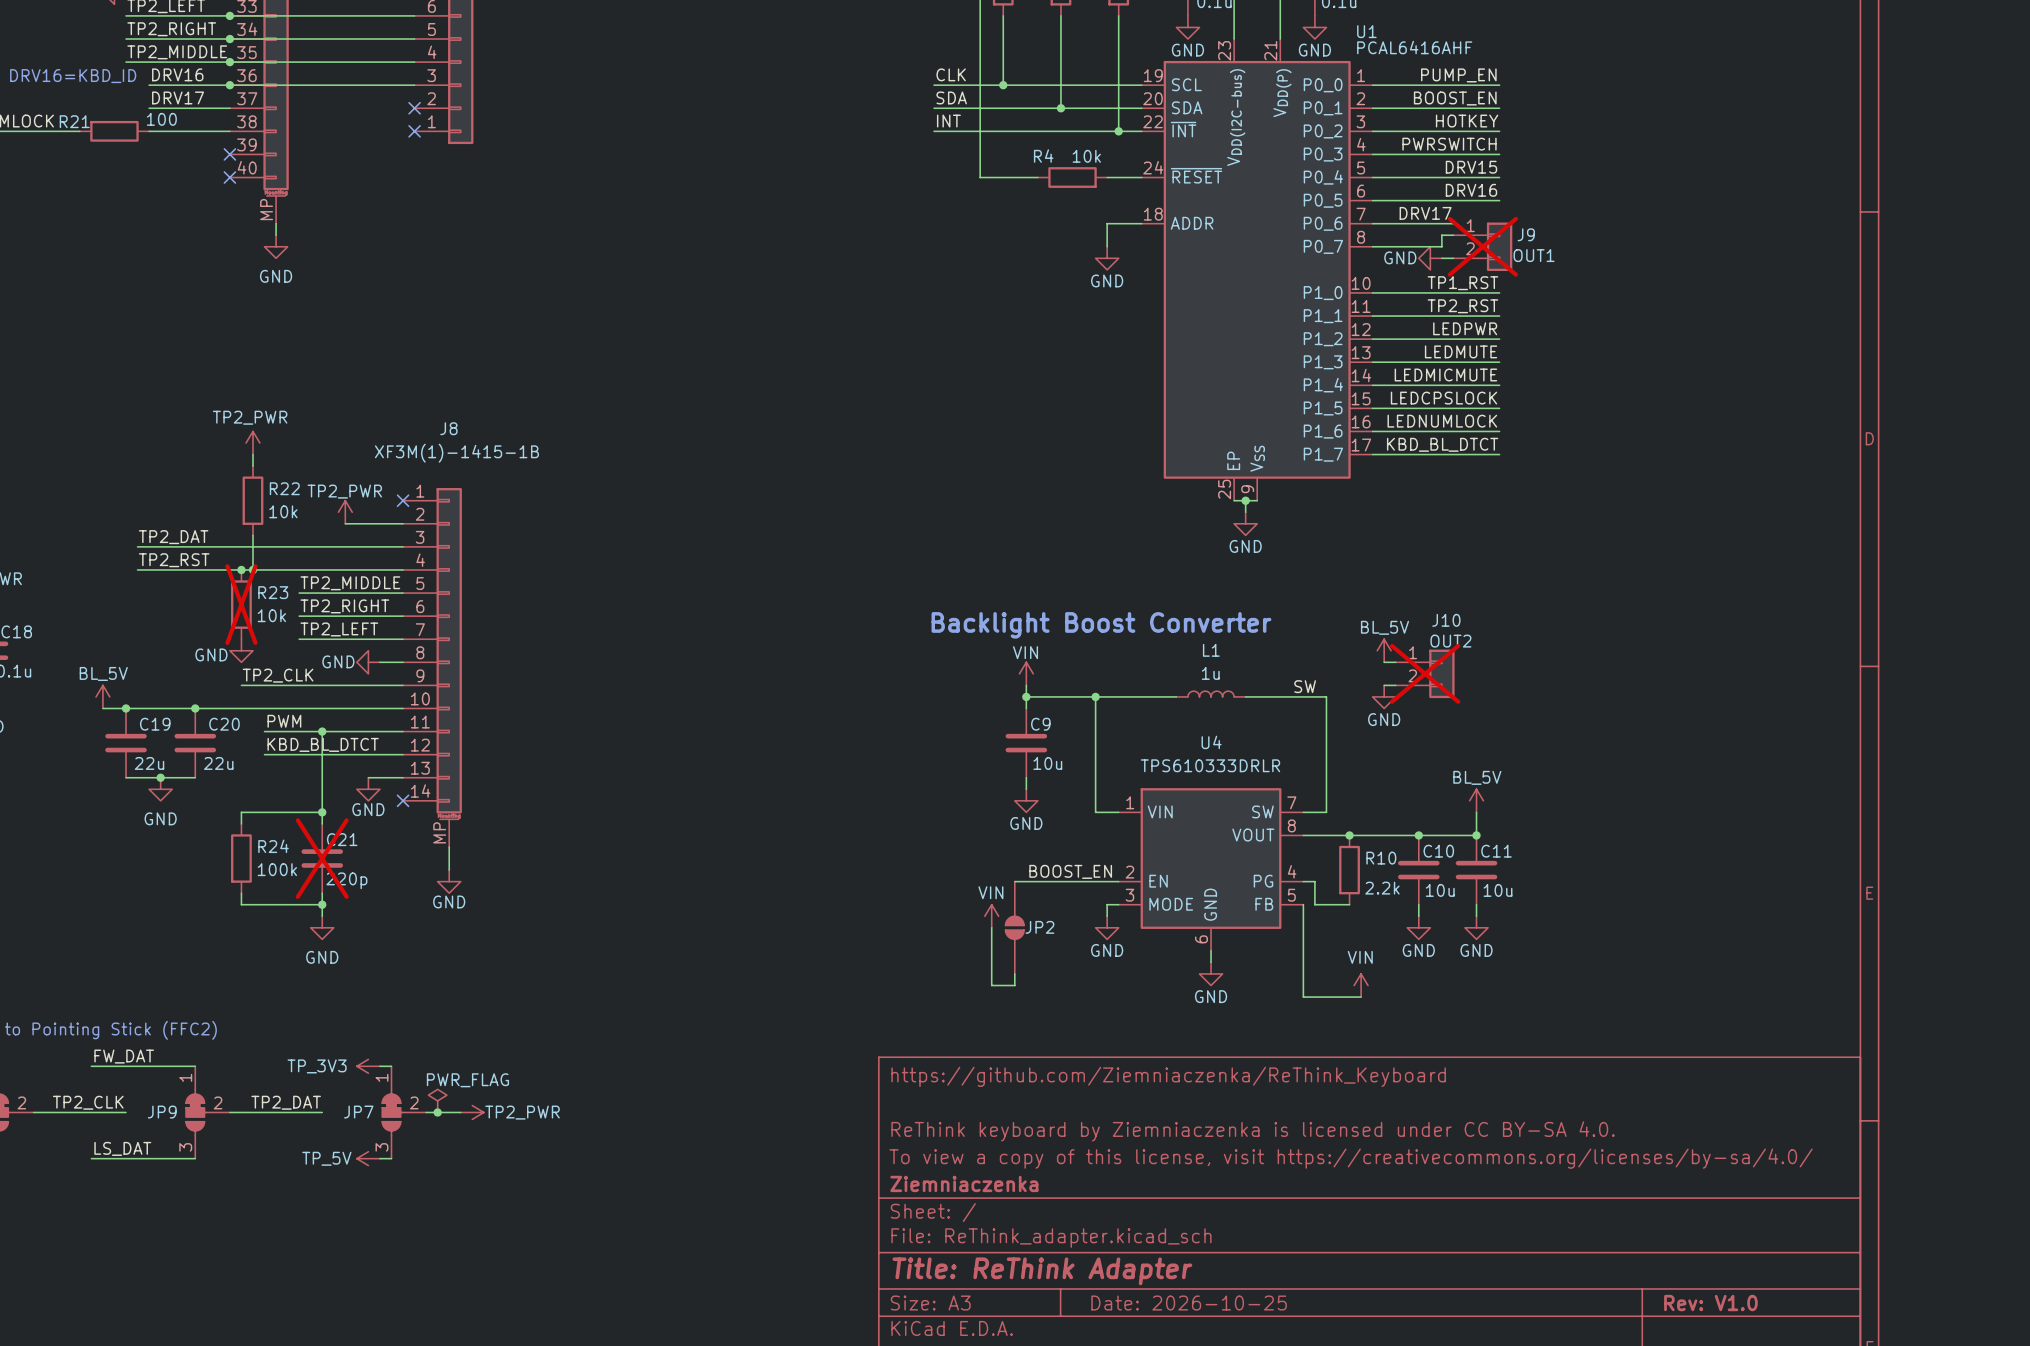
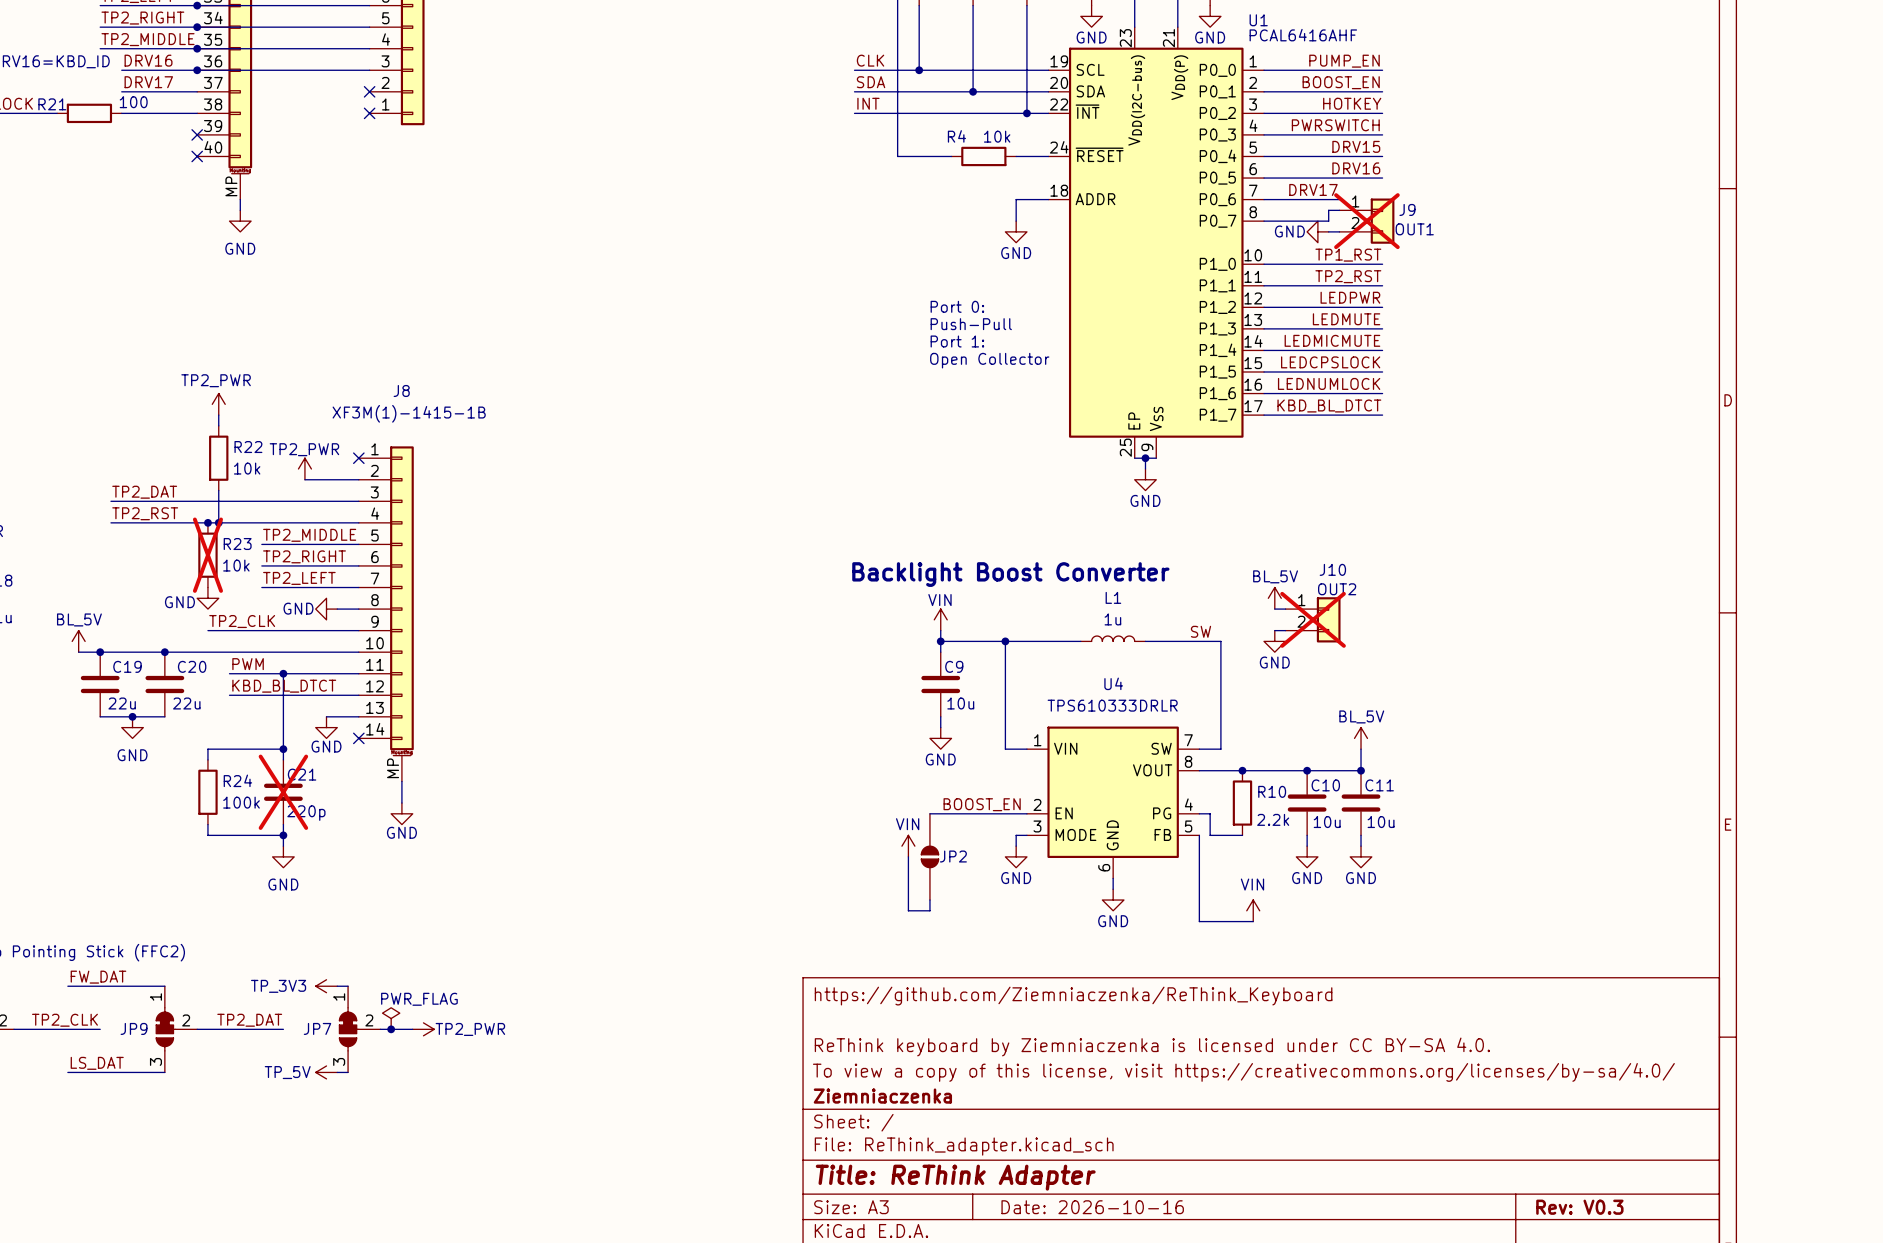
text: none -> Port 0: (957, 306)
text: none -> Push-Pull (971, 324)
text: none -> Port 1: (957, 341)
text: none -> Open Collector (989, 360)
title block: Date: 2026-10-25 (1189, 1303) -> Date: 2026-10-16 (1092, 1207)
title block: Rev: V1.0 (1710, 1303) -> Rev: V0.3 (1579, 1207)

